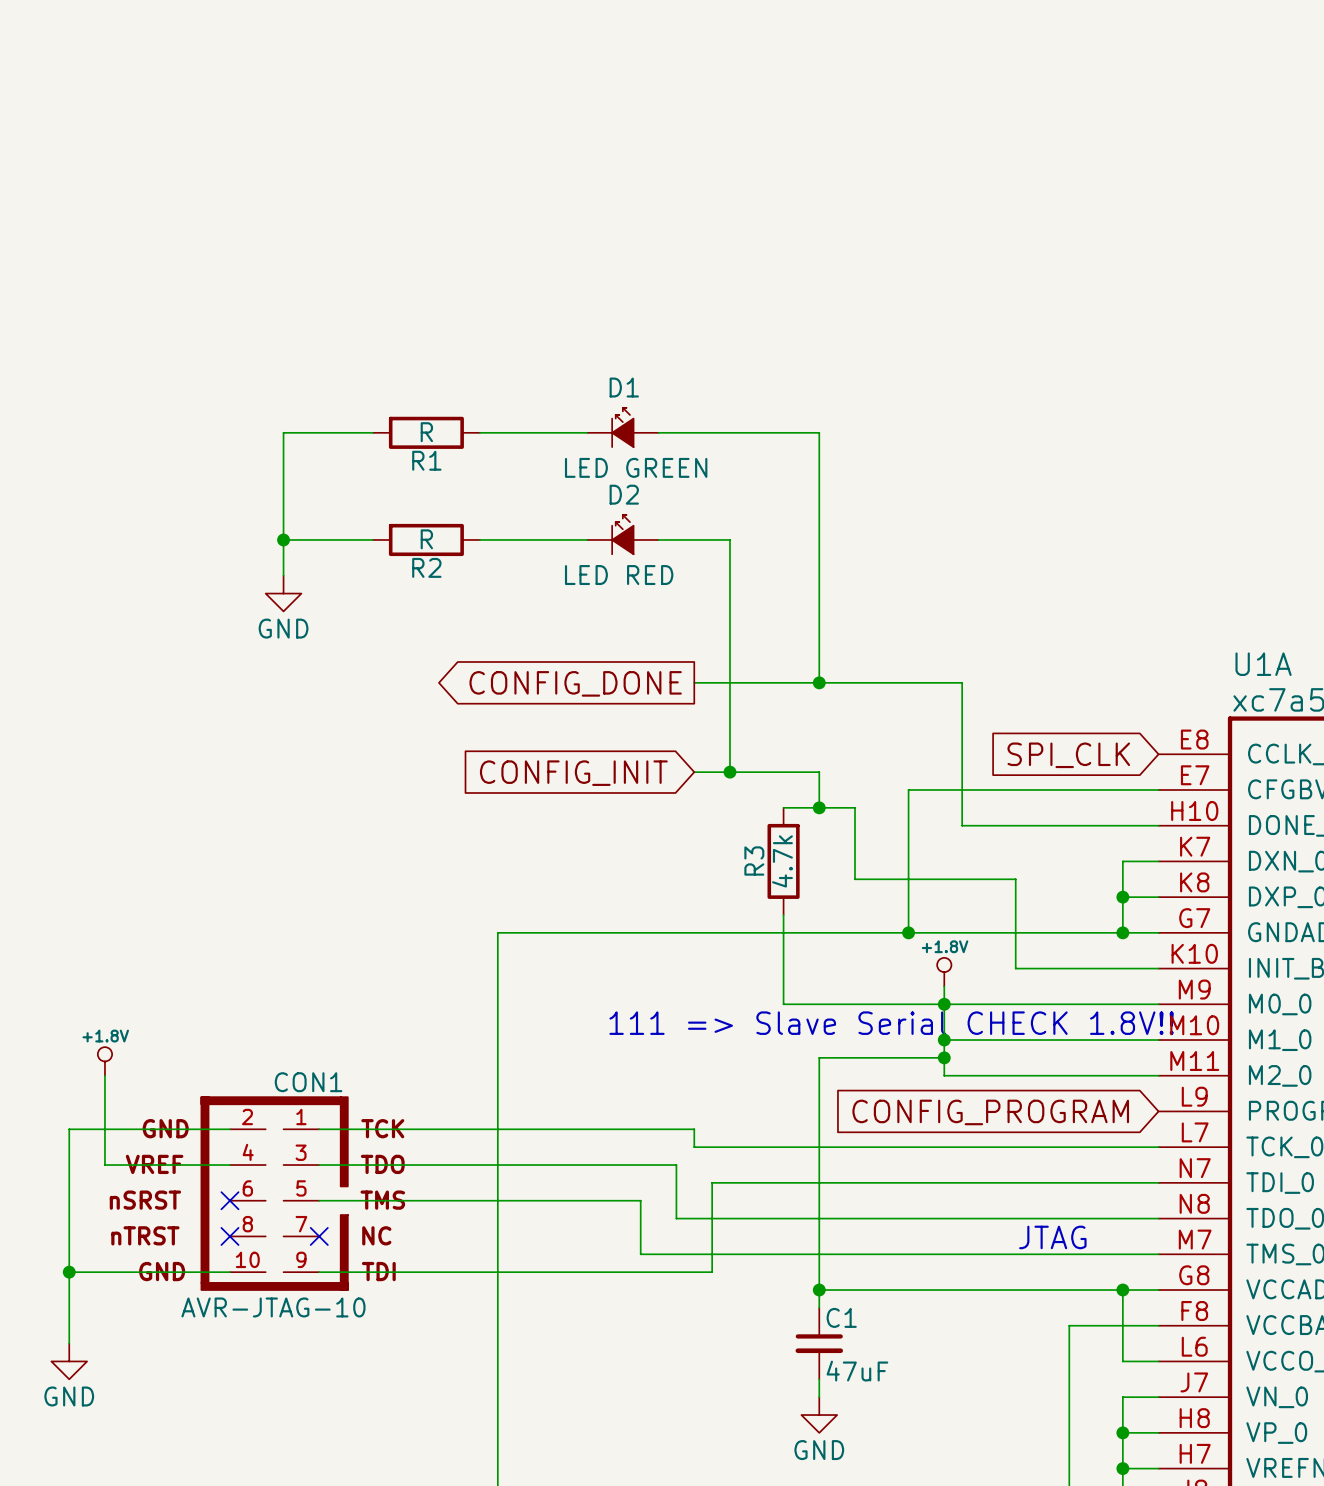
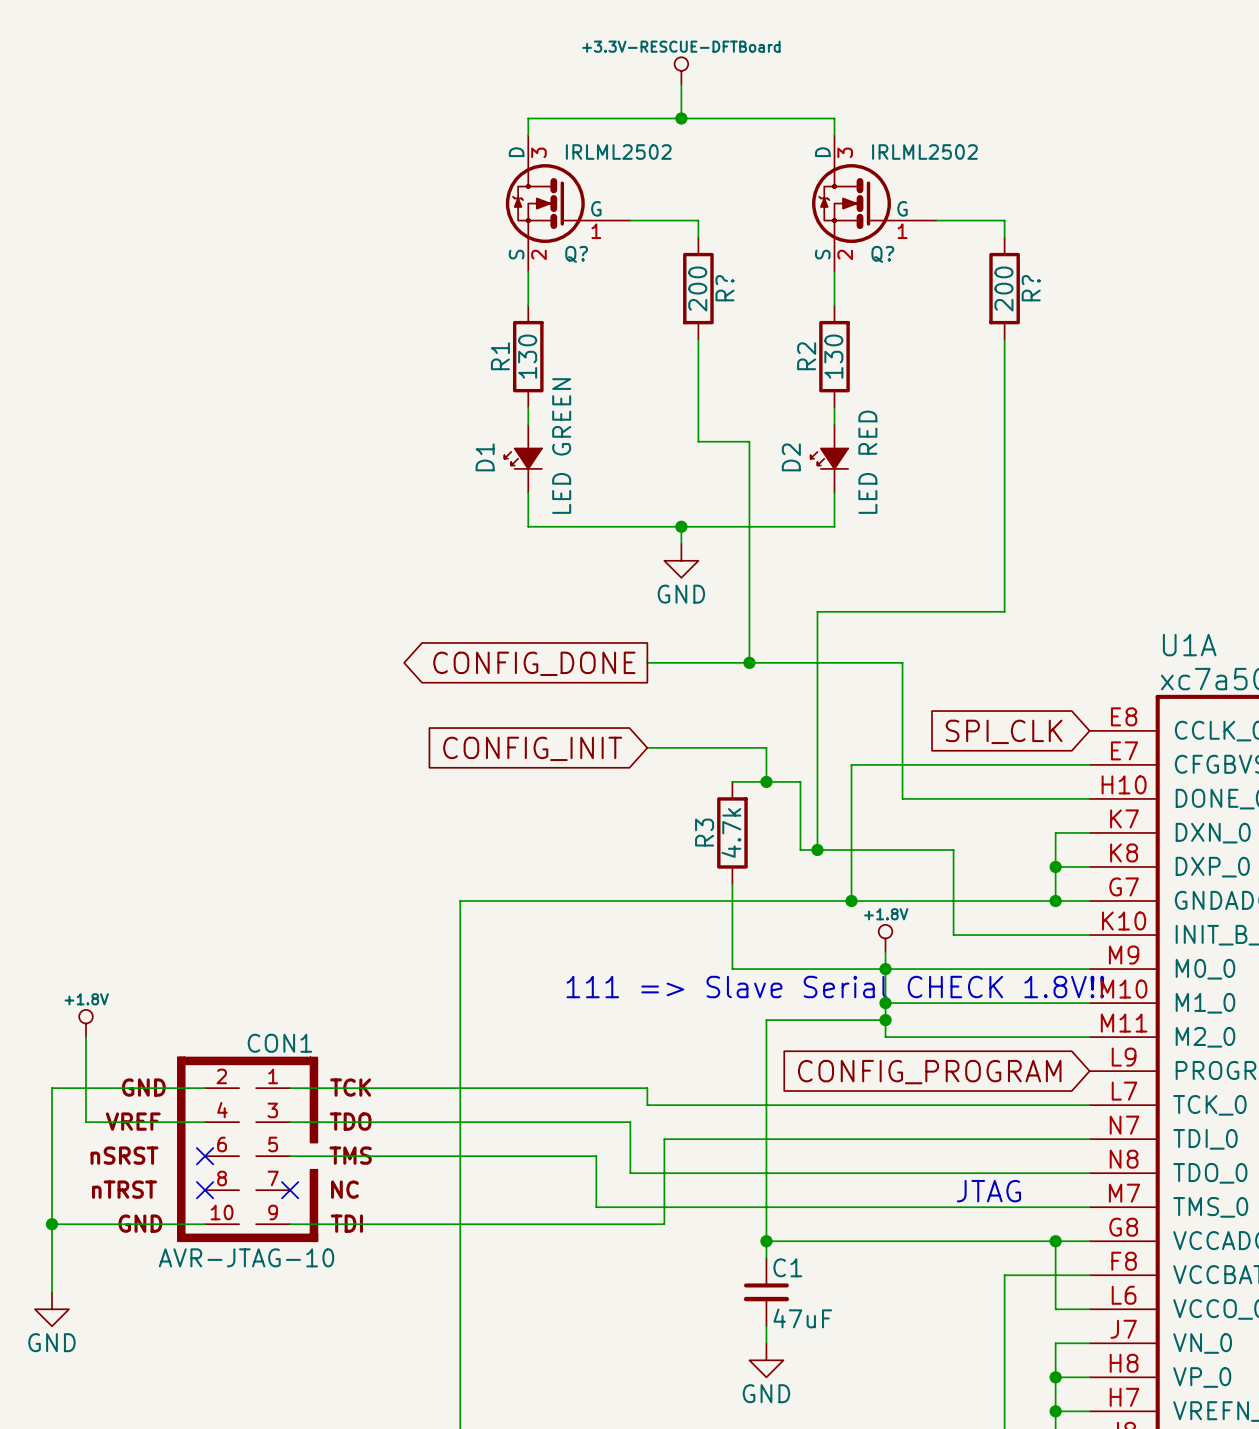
power symbol: none -> +3.3V-RESCUE-DFTBoard (681, 70)
wire: none -> (681, 84) (681, 118)
junction: none -> (681, 118)
wire: none -> (528, 135) (528, 118) (834, 118) (834, 135)
Q?: none -> IRLML2502 (568, 203)
Q?: none -> IRLML2502 (874, 203)
wire: none -> (630, 220) (698, 220) (698, 237)
wire: none -> (936, 220) (1004, 220) (1004, 237)
wire: none -> (528, 271) (528, 305)
wire: none -> (834, 271) (834, 305)
R?: none -> 200 (698, 288)
R?: none -> 200 (1004, 288)
wire: none -> (698, 339) (698, 441) (749, 441) (749, 662)
wire: none -> (1004, 339) (1004, 611) (817, 611) (817, 849)
wire: none -> (528, 407) (528, 424)
wire: none -> (834, 407) (834, 424)
D1 rotation: 0° (622, 427) -> 90° counterclockwise (523, 458)
D1 position: (622, 427) -> (523, 458)
wire: (372, 432) (283, 432) (283, 575) -> none
R1 rotation: 0° (426, 432) -> 90° clockwise (528, 356)
R1 position: (426, 432) -> (528, 356)
R1 value: R (426, 432) -> 130 (527, 356)
wire: (479, 432) (587, 432) -> none
wire: (658, 432) (819, 432) (819, 682) -> none
wire: none -> (834, 492) (834, 526) (681, 526)
D2 rotation: 0° (622, 534) -> 90° counterclockwise (829, 458)
D2 position: (622, 534) -> (829, 458)
wire: (283, 539) (372, 539) -> none
junction: (283, 539) -> none
R2 rotation: 0° (426, 539) -> 90° clockwise (834, 356)
R2 position: (426, 539) -> (834, 356)
R2 value: R (426, 539) -> 130 (833, 356)
wire: (479, 539) (569, 539) -> (528, 492) (528, 526)
junction: none -> (681, 526)
wire: (729, 557) (729, 772) -> none
power symbol: none -> GND (681, 560)
power symbol: GND (283, 593) -> none
junction position: (819, 682) -> (749, 662)
junction: (729, 772) -> none
junction: none -> (817, 849)

